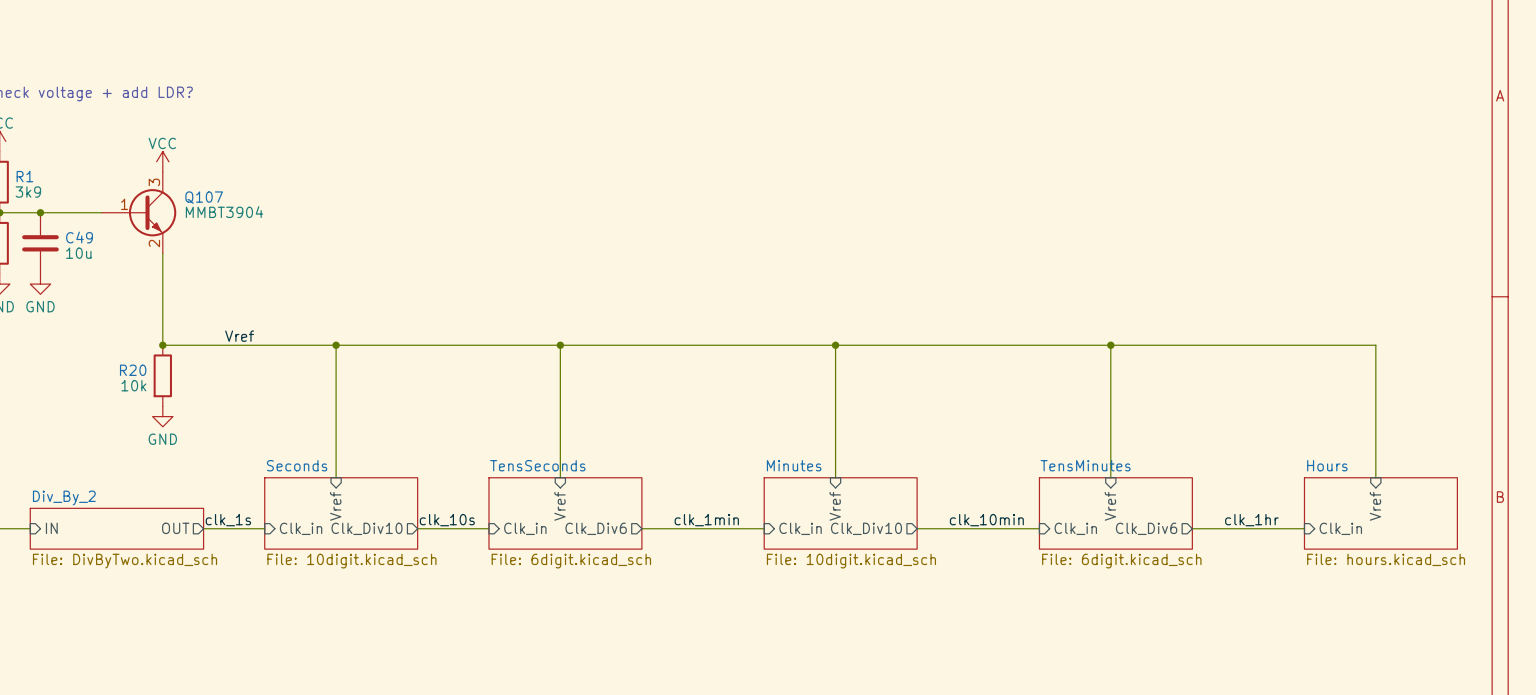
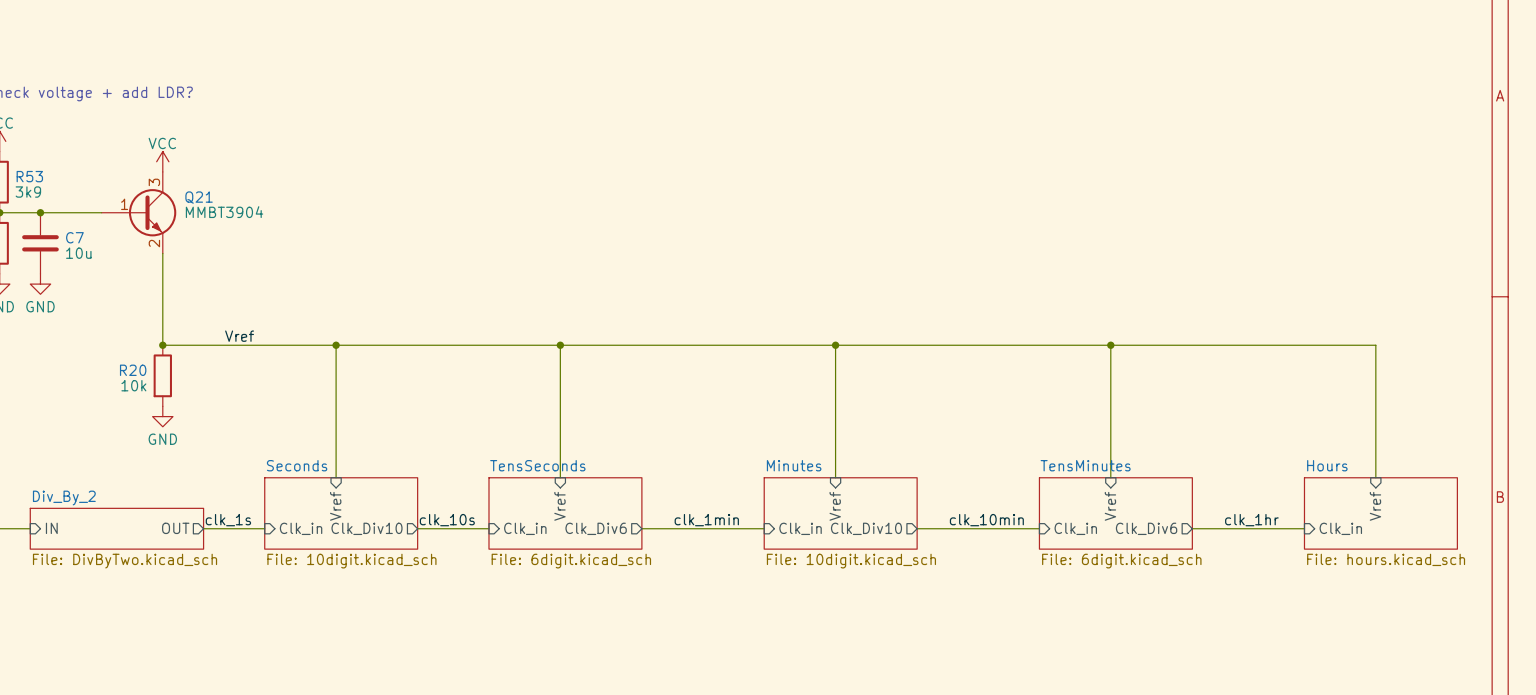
R1 name: R1 (24, 176) -> R53 (29, 176)
Q107 name: Q107 (204, 197) -> Q21 (199, 197)
C49 name: C49 (79, 237) -> C7 (74, 237)

